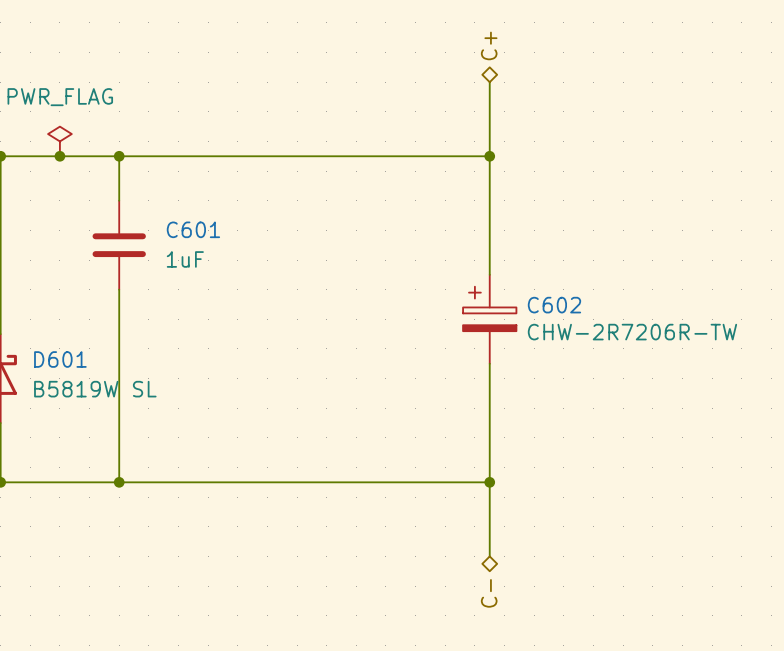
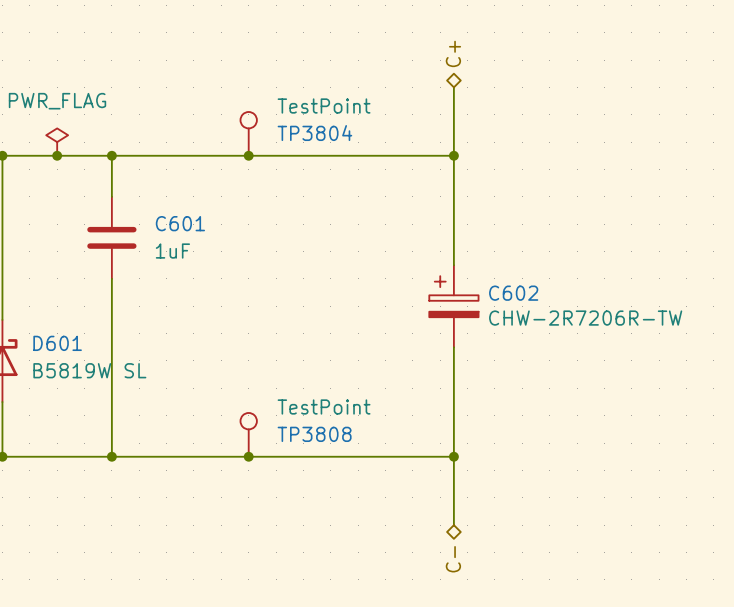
TP3804: none -> TestPoint (248, 133)
junction: none -> (248, 155)
TP3808: none -> TestPoint (248, 434)
junction: none -> (248, 456)

